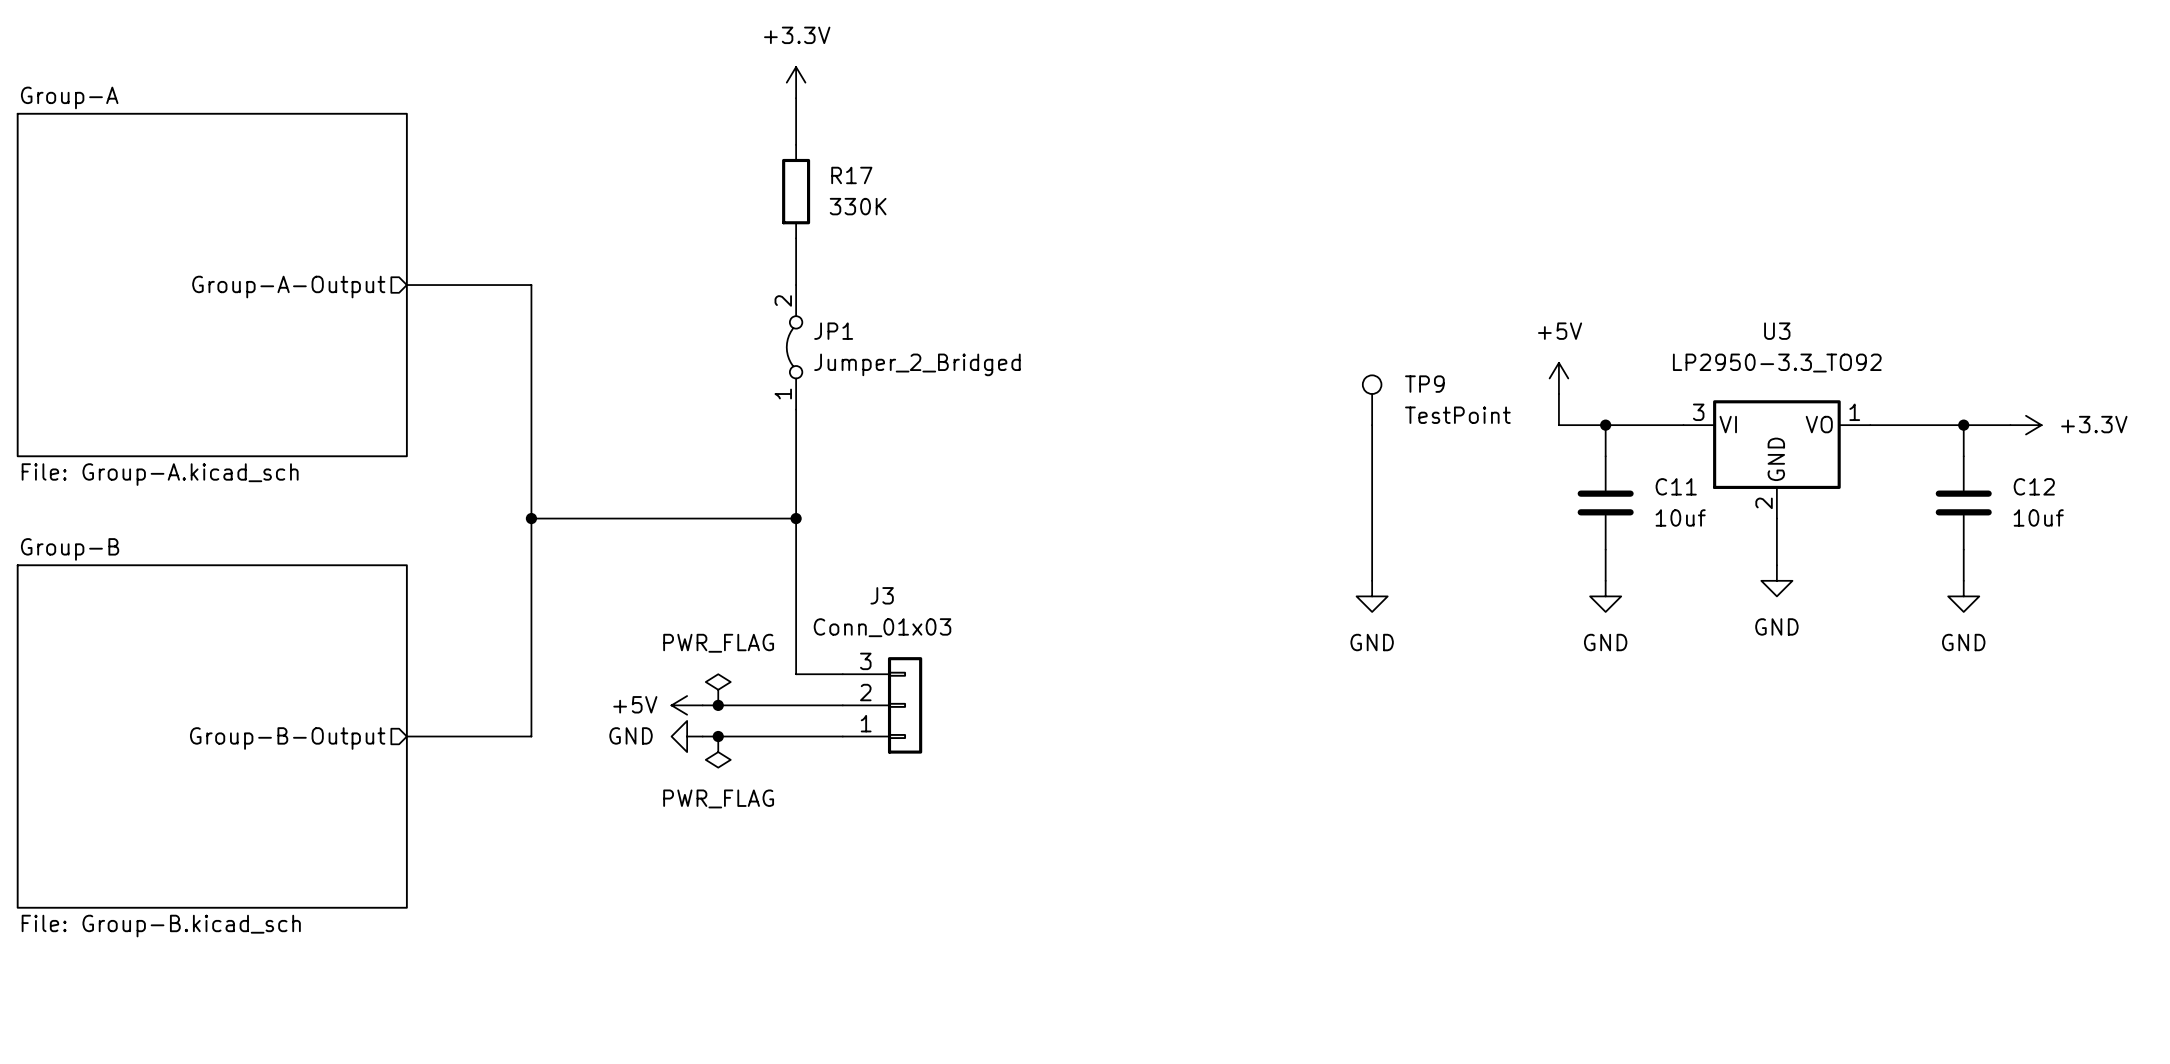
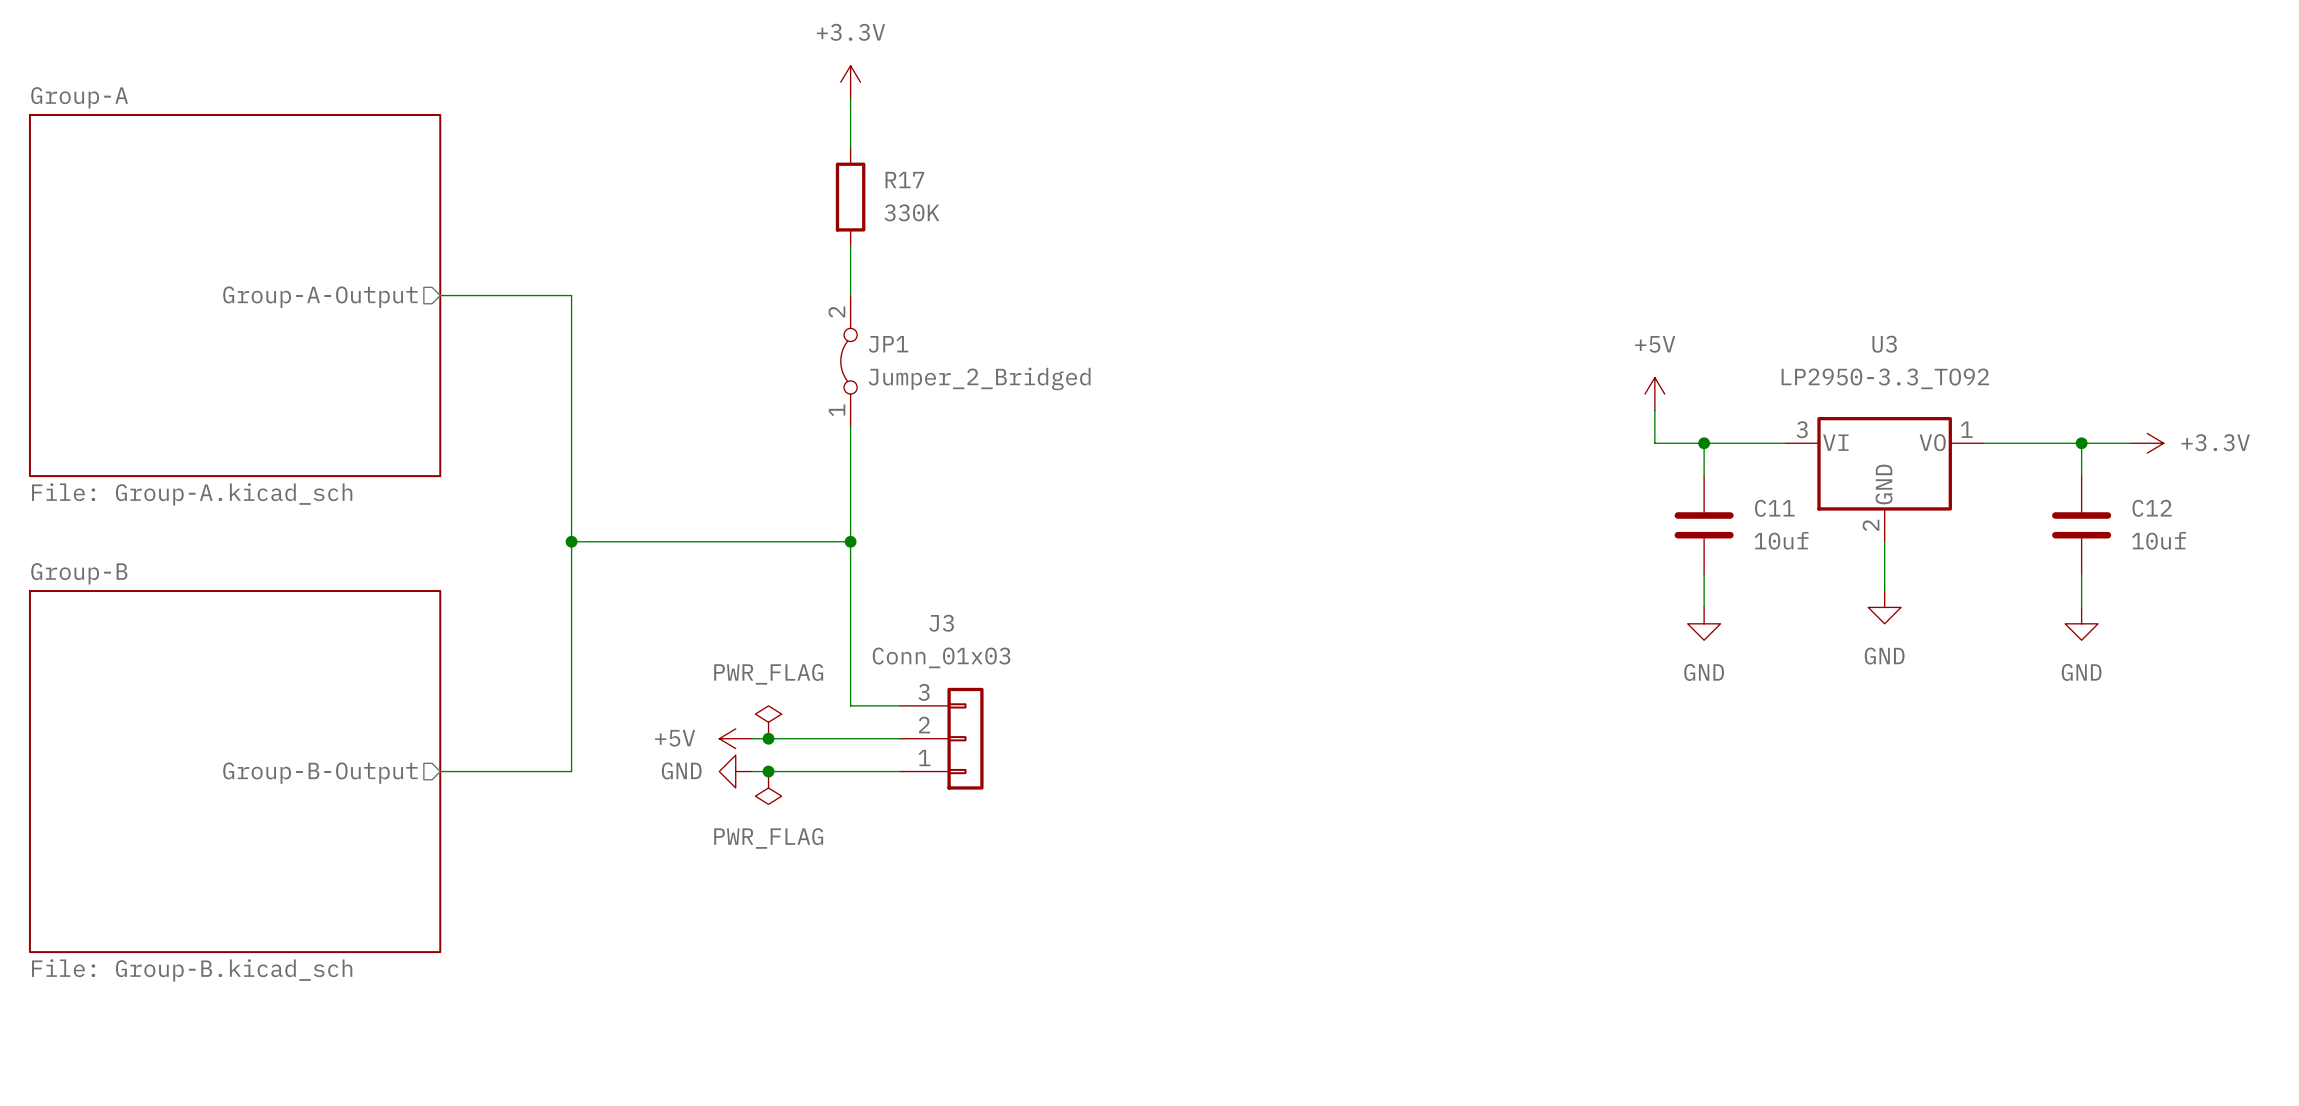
TP9: TestPoint (1372, 400) -> none
wire: (1372, 425) (1372, 580) -> none
power symbol: GND (1372, 596) -> none

